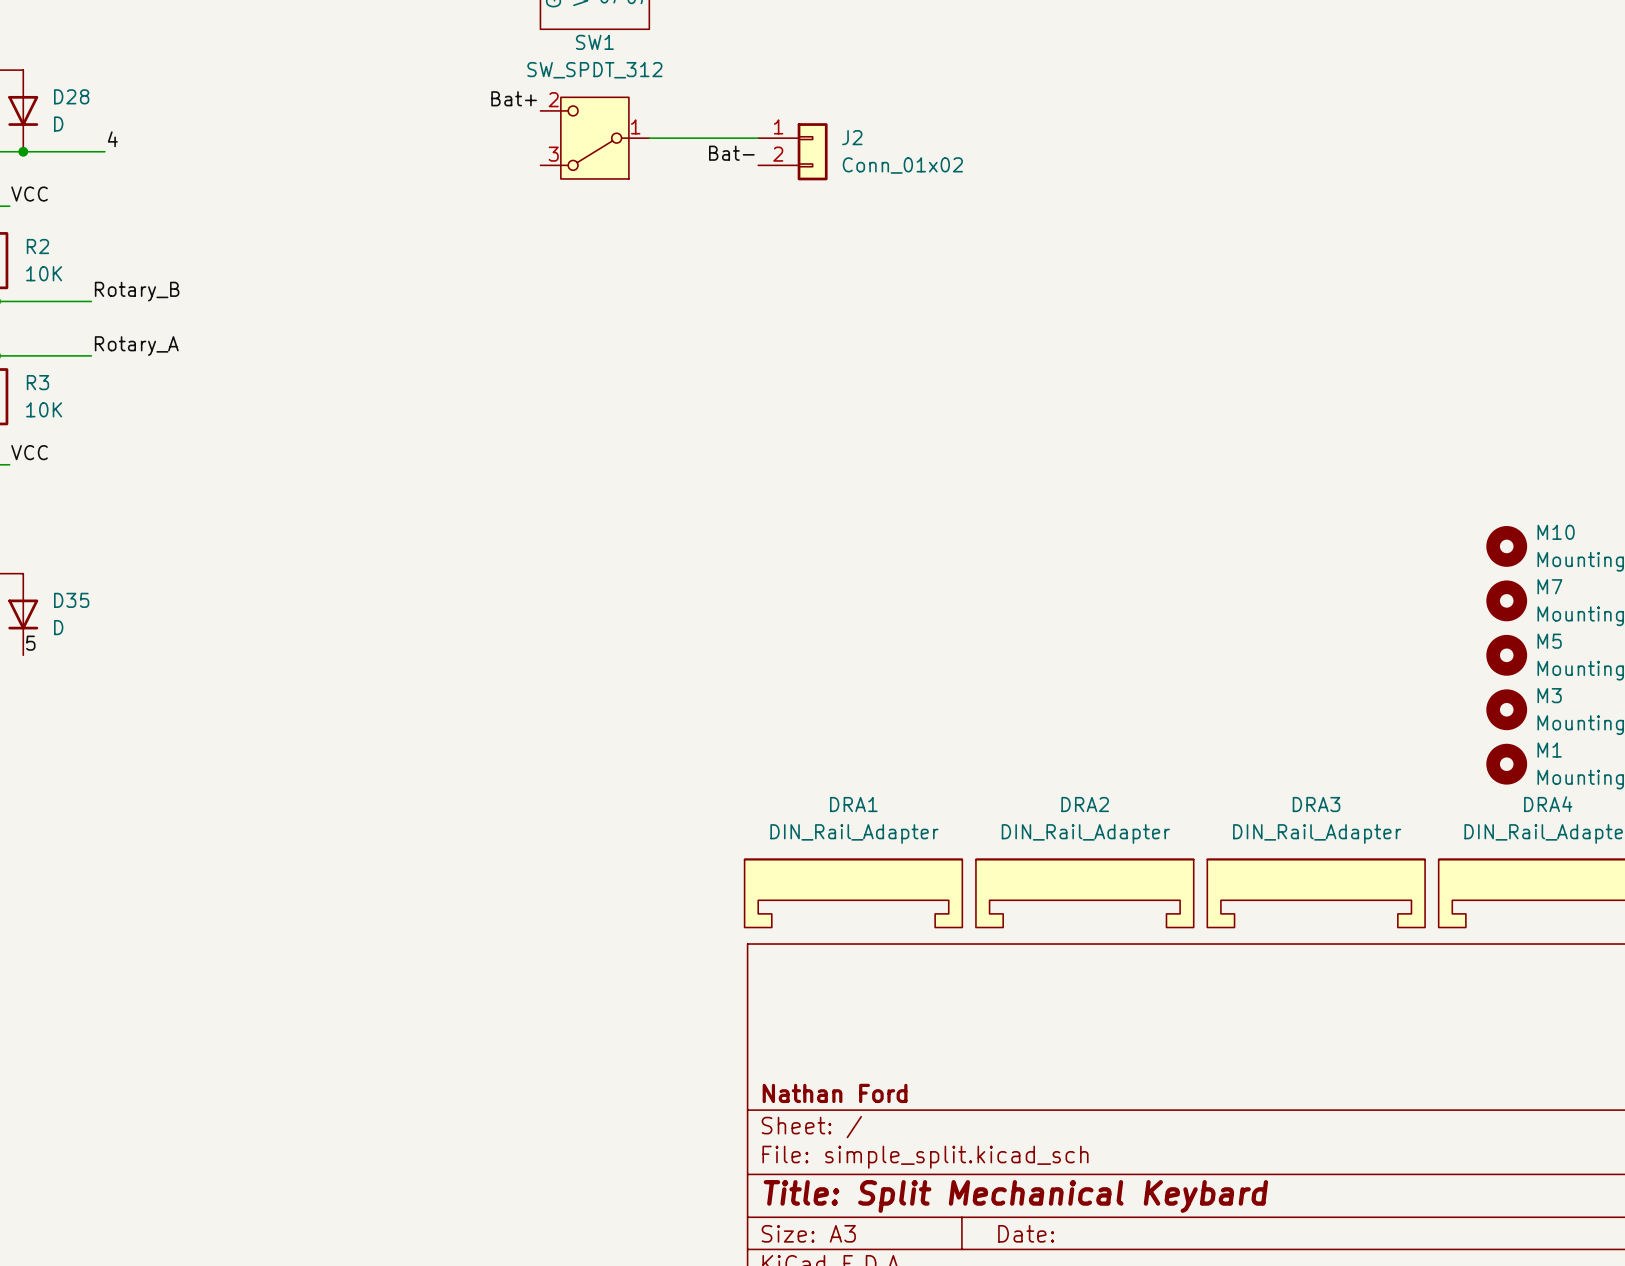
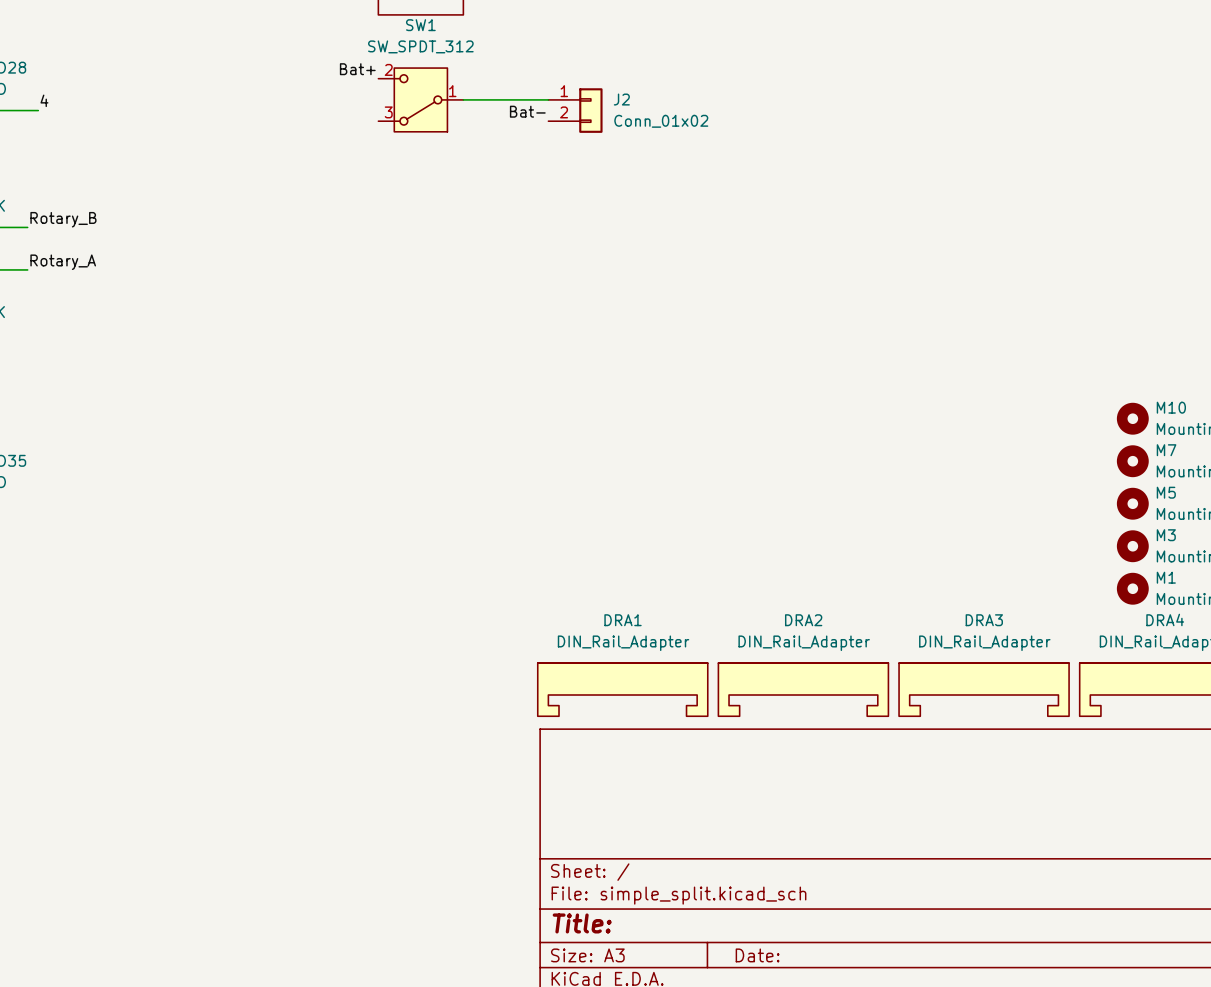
title block: Nathan Ford (835, 1093) -> none
title block: Title: Split Mechanical Keybard (1015, 1196) -> Title: (582, 923)

